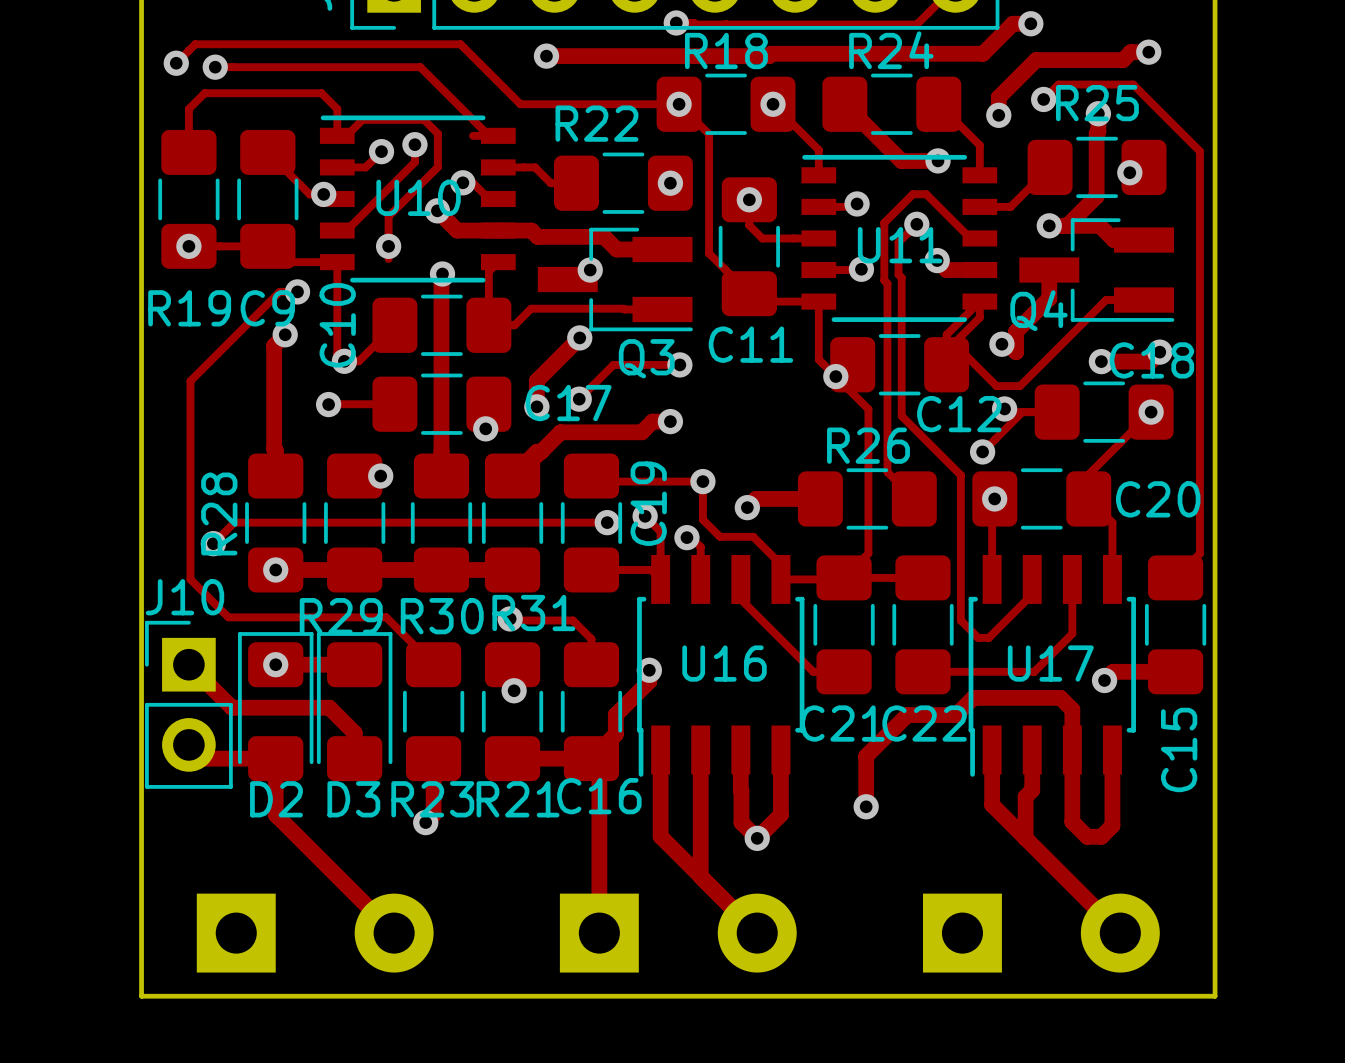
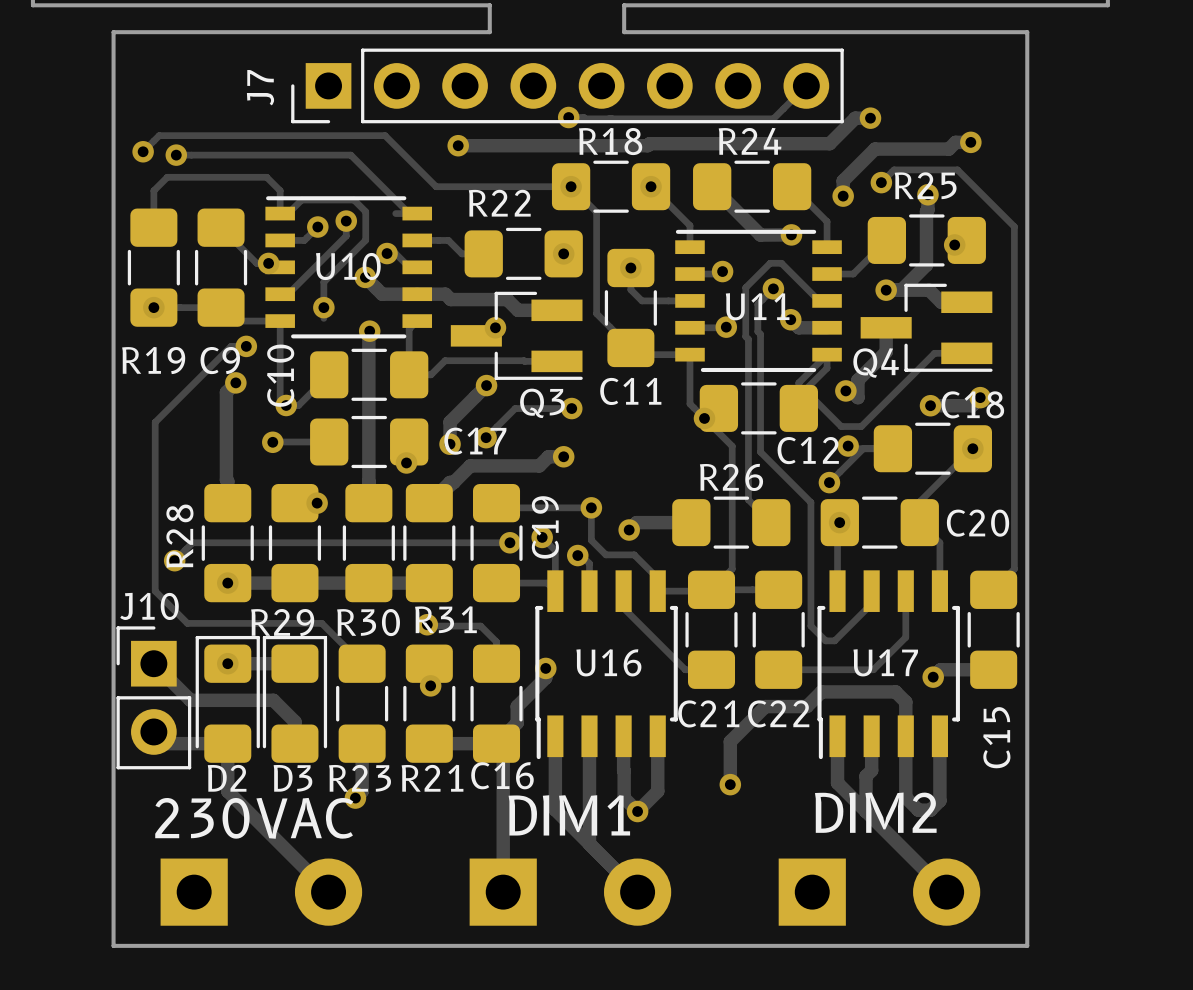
text: none -> DIM2 (875, 812)
text: none -> DIM1 (569, 815)
text: none -> 230VAC (254, 818)

